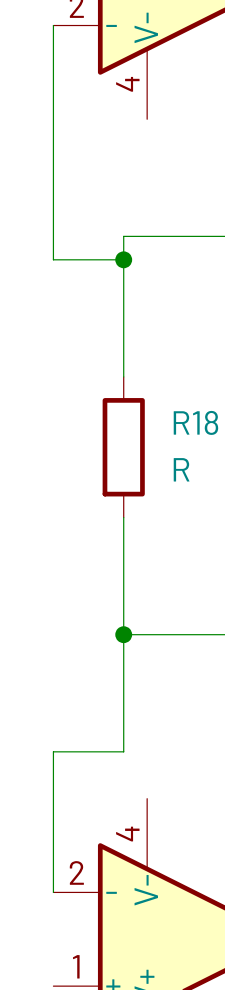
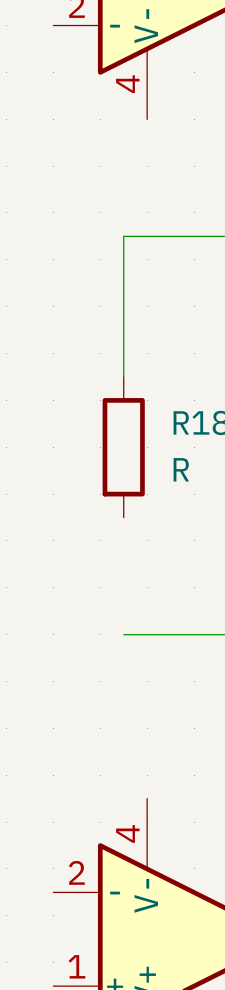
wire: (53, 25) (53, 259) (123, 259) -> none
junction: (123, 259) -> none
wire: (123, 517) (123, 751) (53, 751) (53, 892) -> none
junction: (123, 634) -> none

